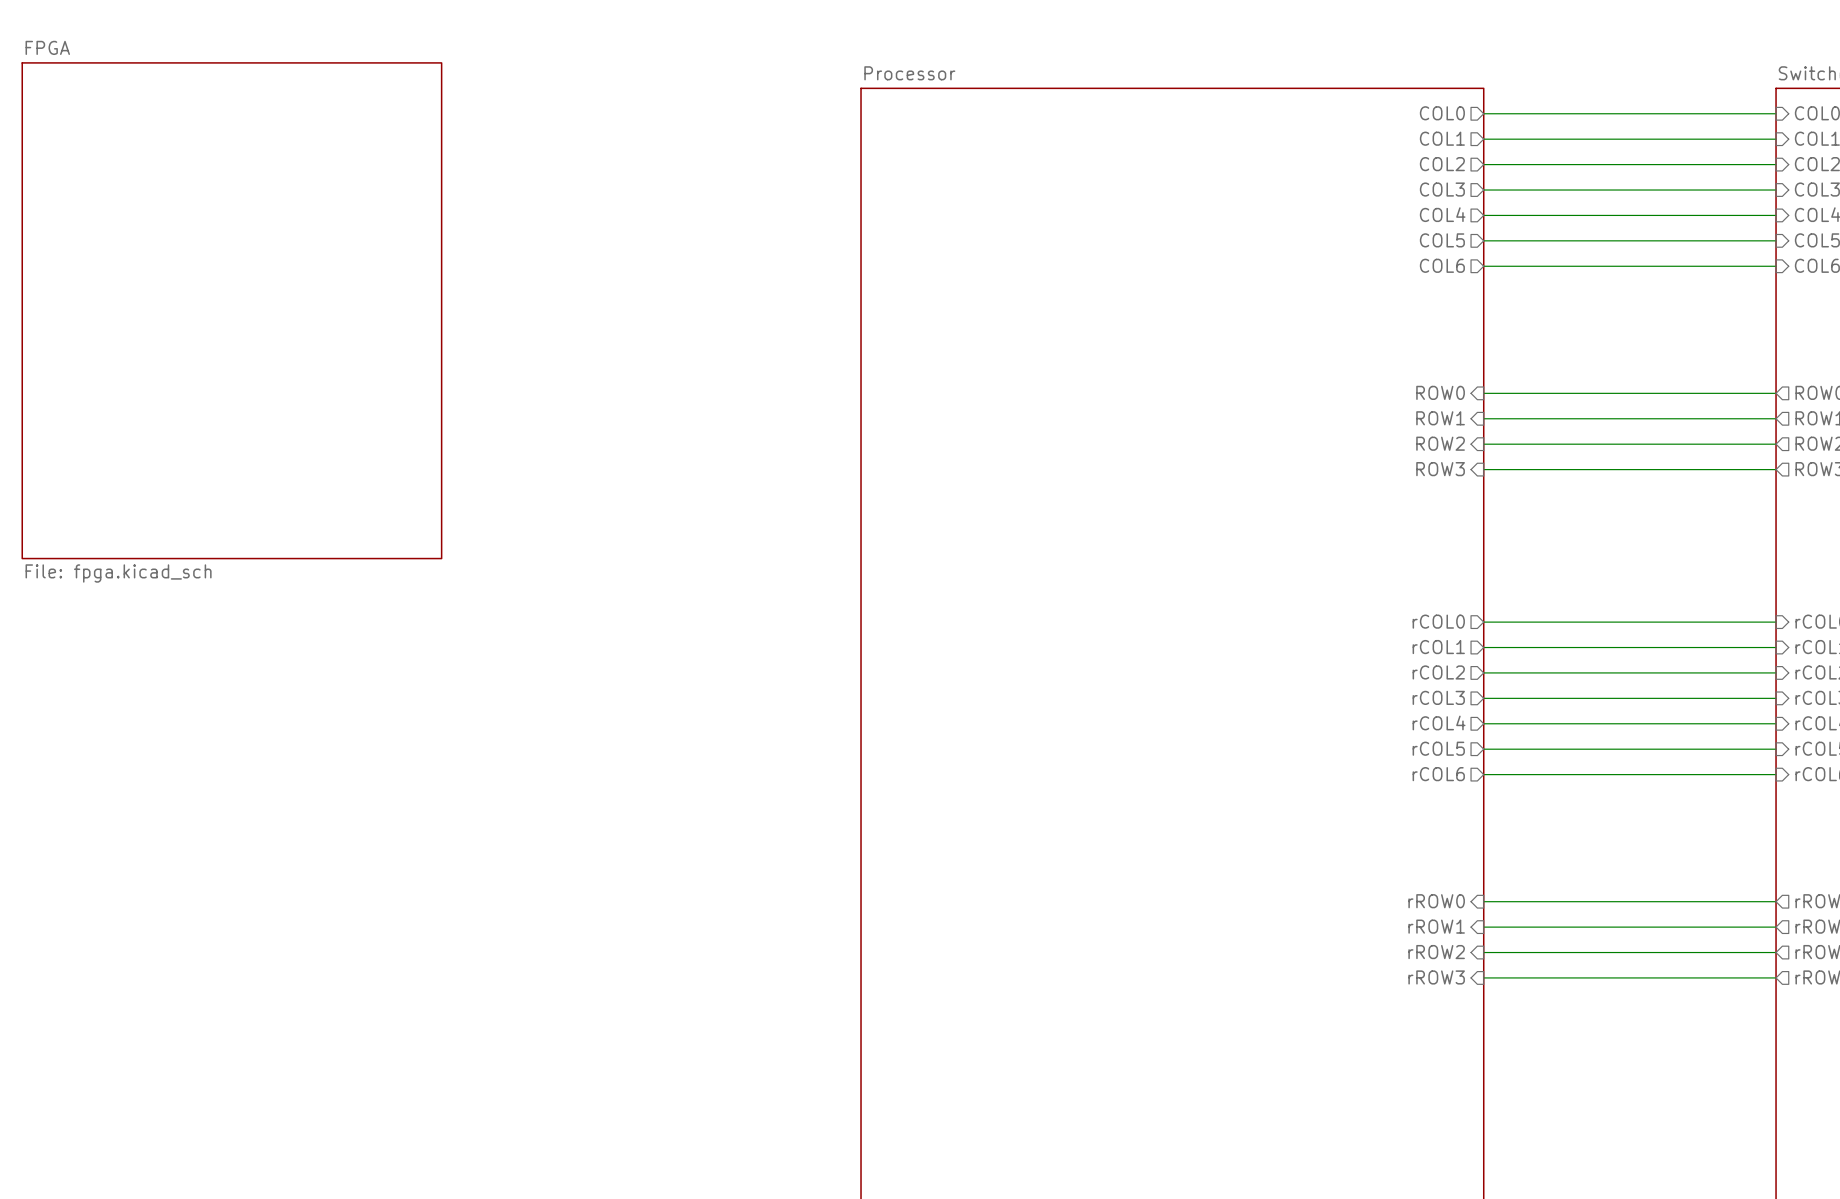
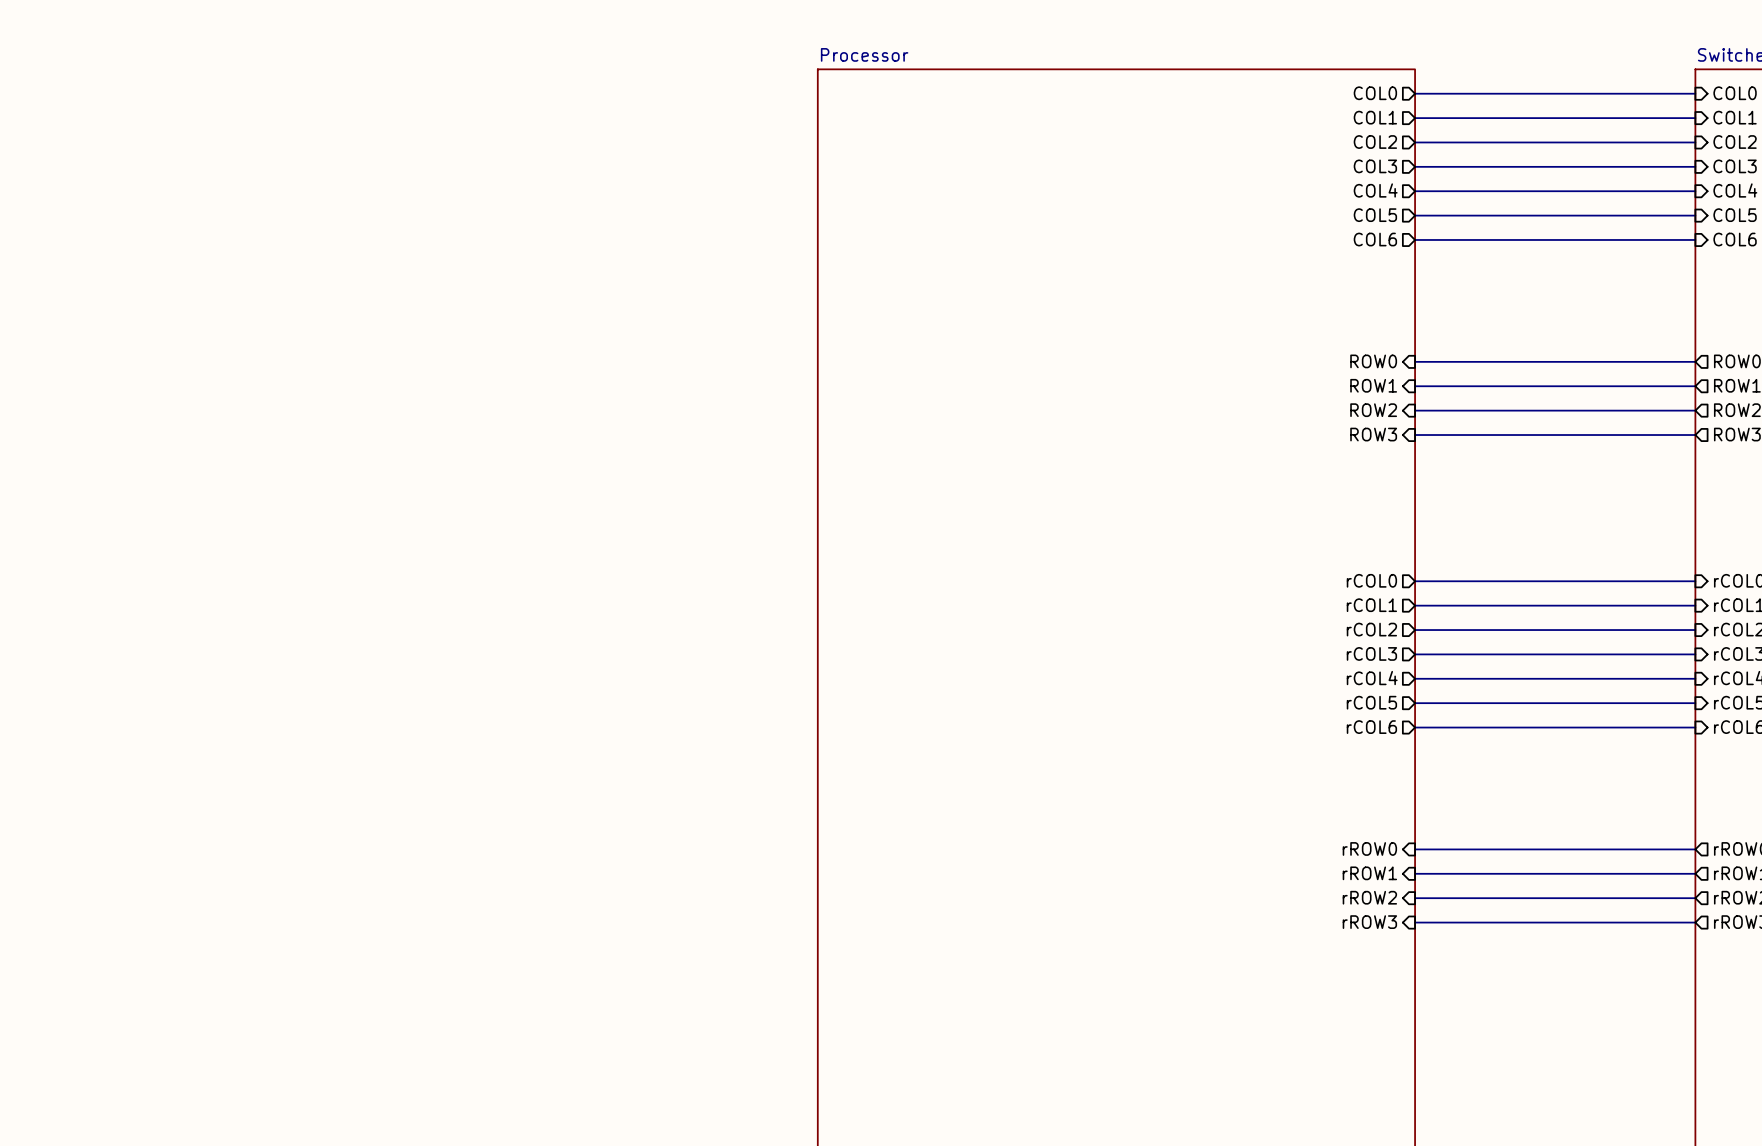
sheet FPGA: File: fpga.kicad_sch (231, 310) -> none

